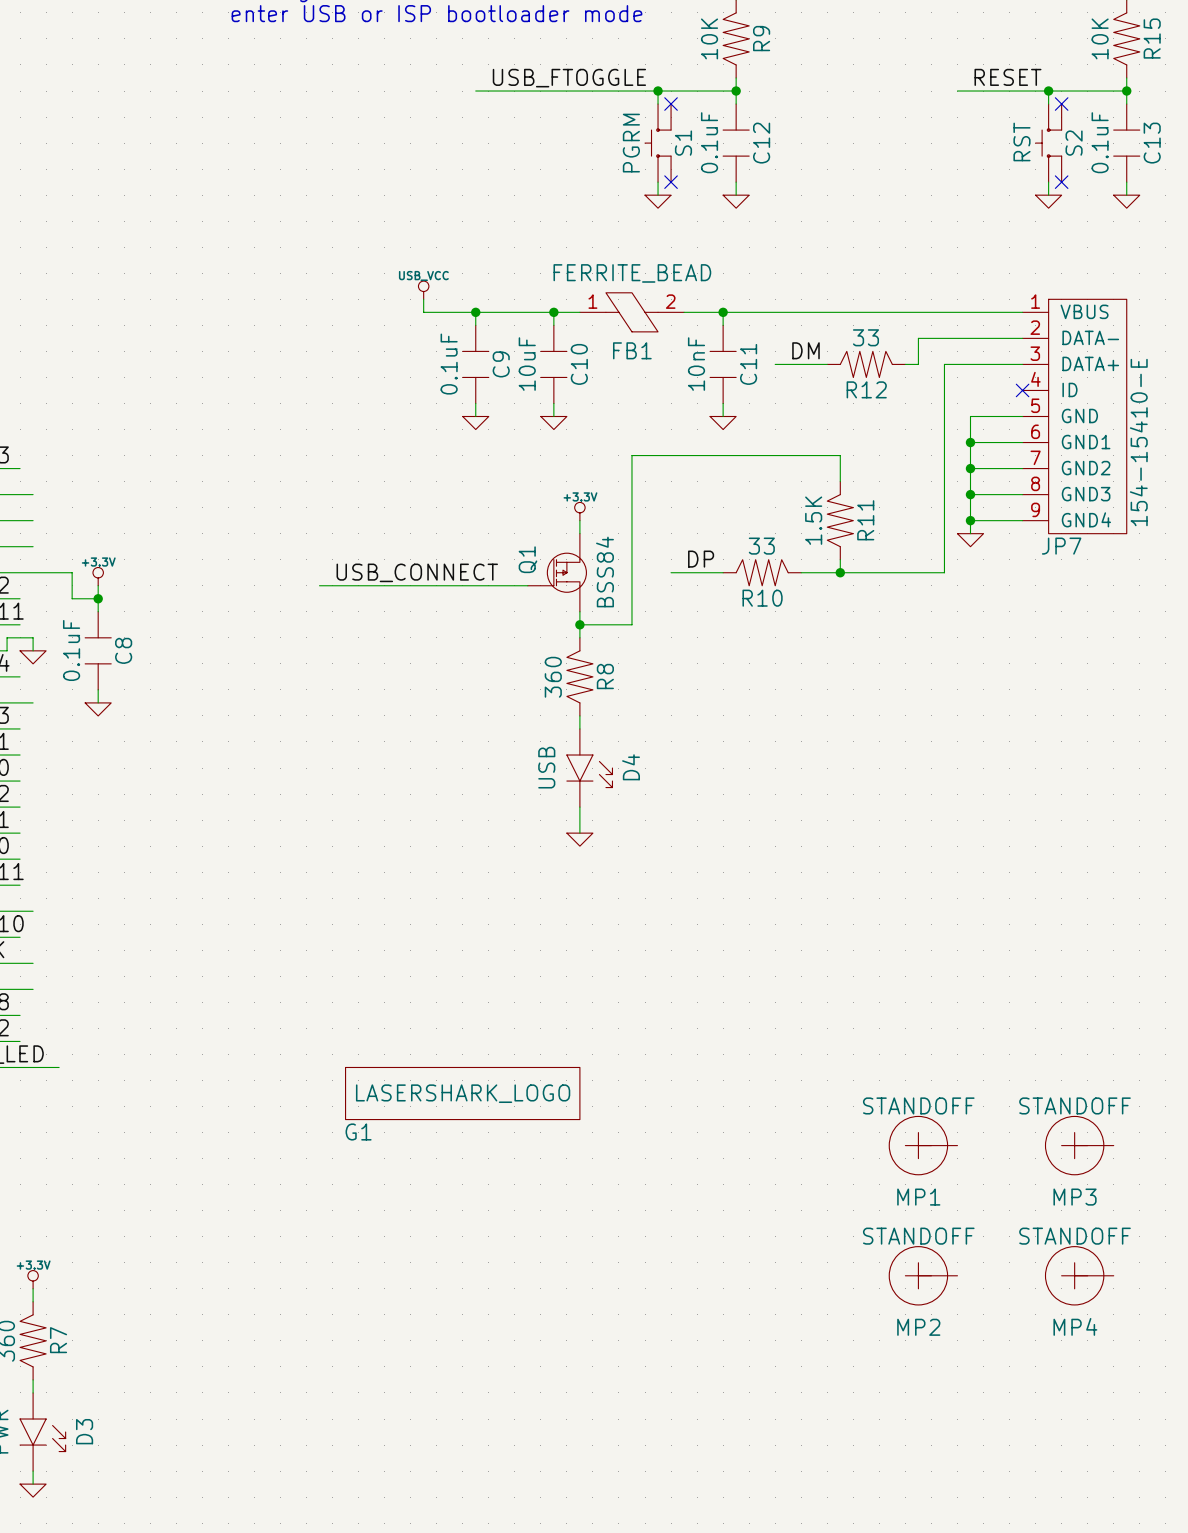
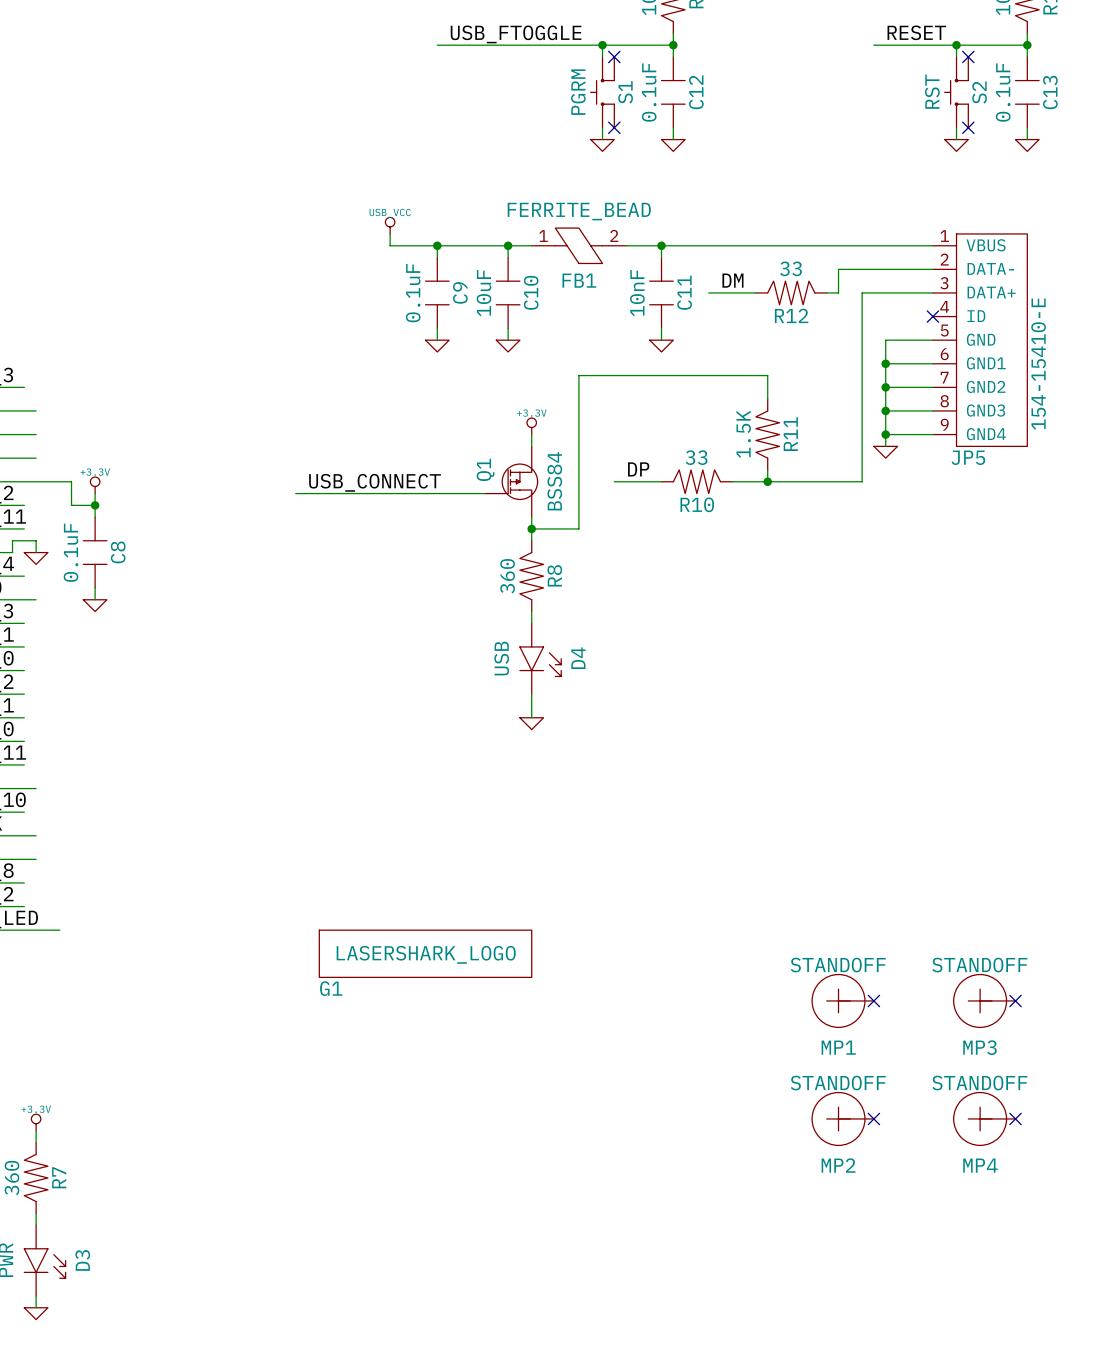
JP7 name: JP7 (1061, 546) -> JP5 (968, 457)
no-connect mark: none -> (873, 1000)
no-connect mark: none -> (1015, 1000)
no-connect mark: none -> (873, 1118)
no-connect mark: none -> (1015, 1118)

